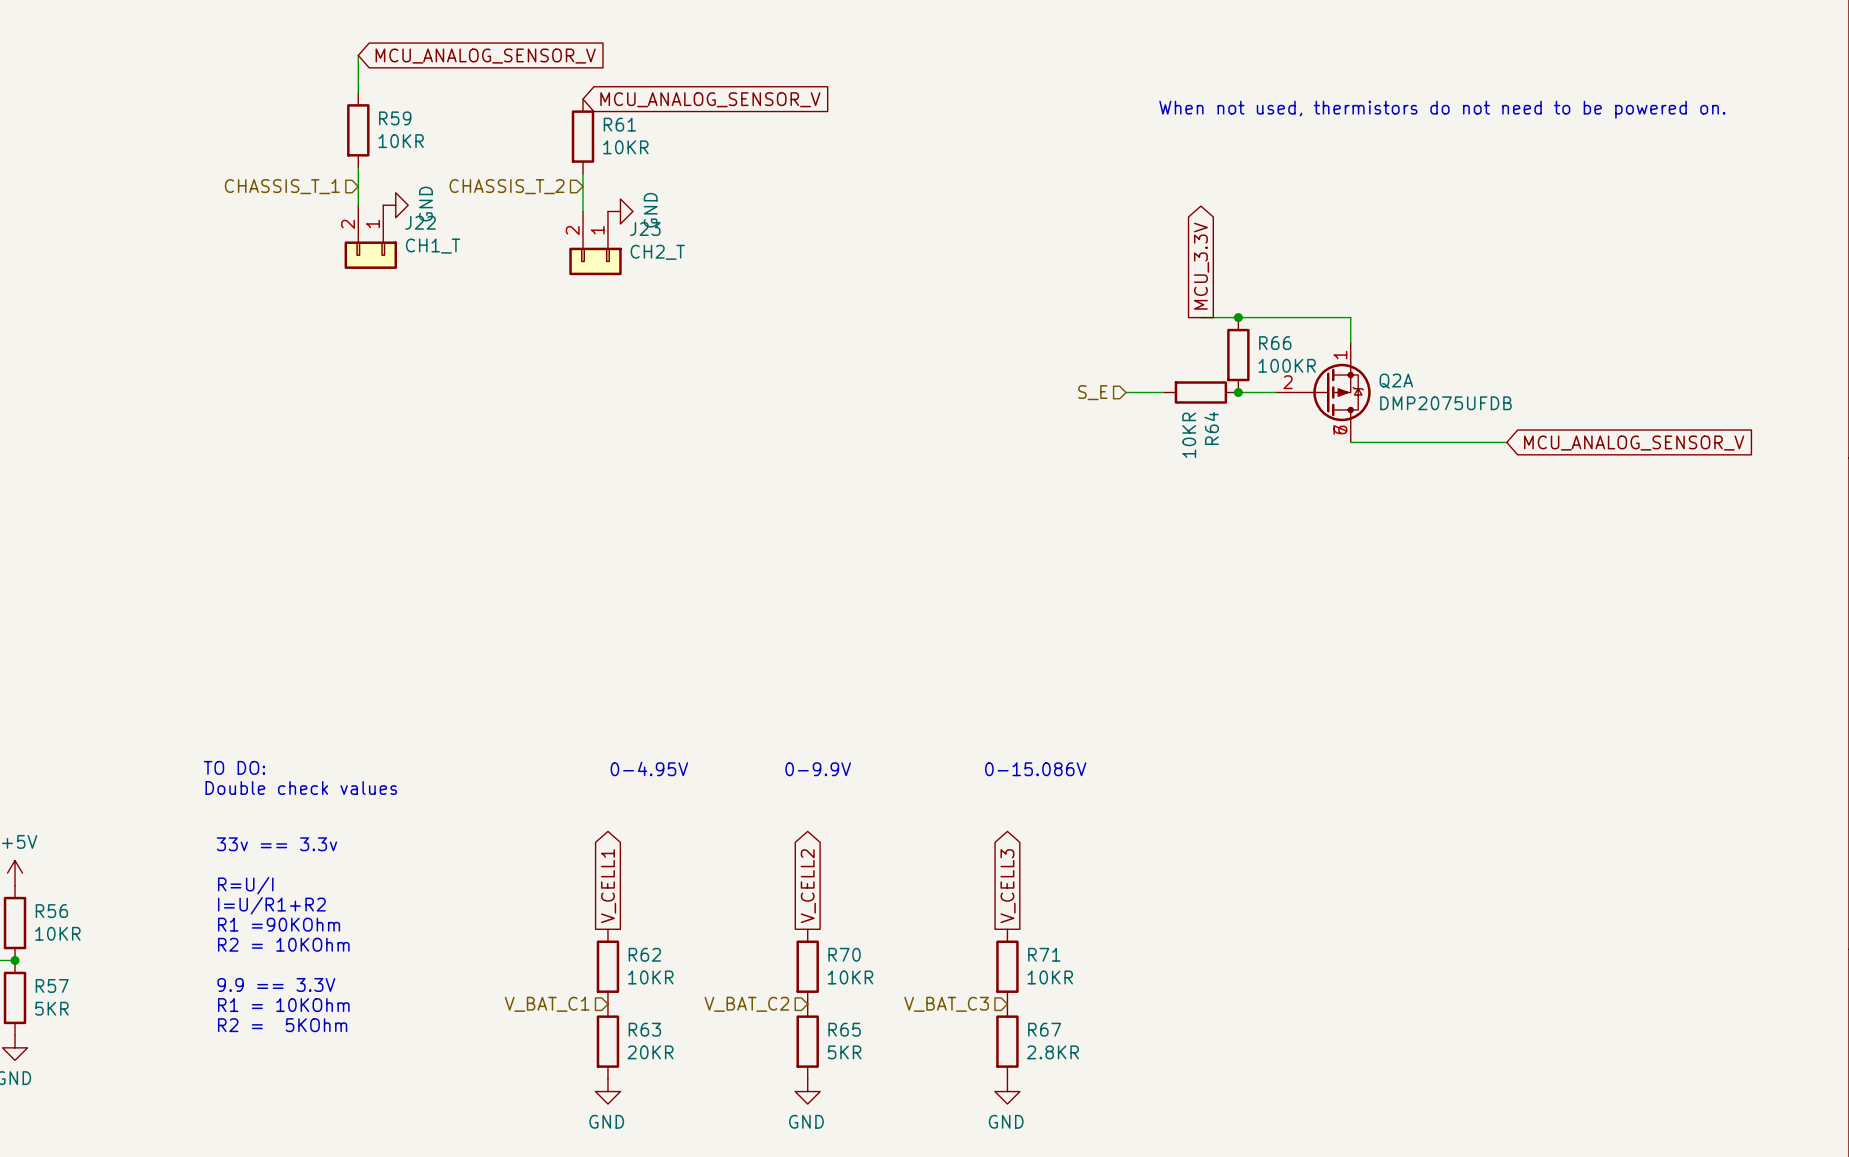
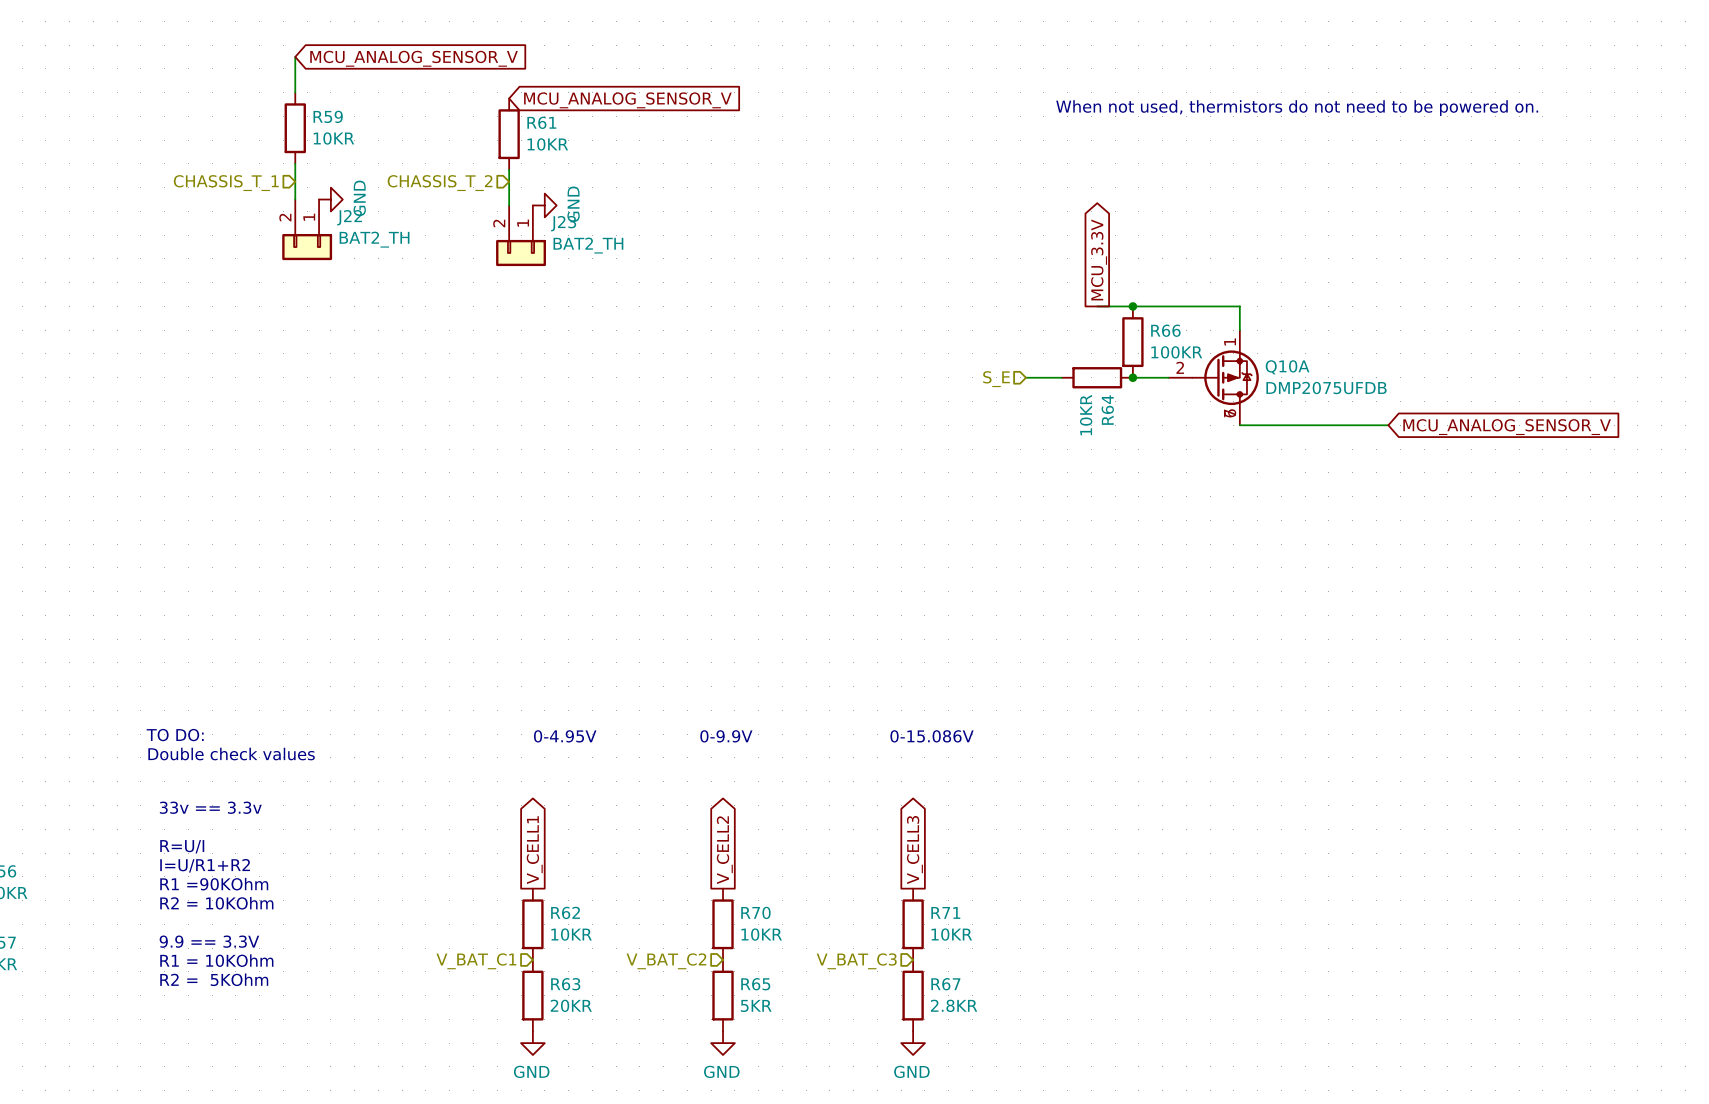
J22 value: CH1_T (433, 246) -> BAT2_TH (374, 239)
J23 value: CH2_T (657, 252) -> BAT2_TH (588, 245)
Q2A name: Q2A (1396, 381) -> Q10A (1287, 367)

